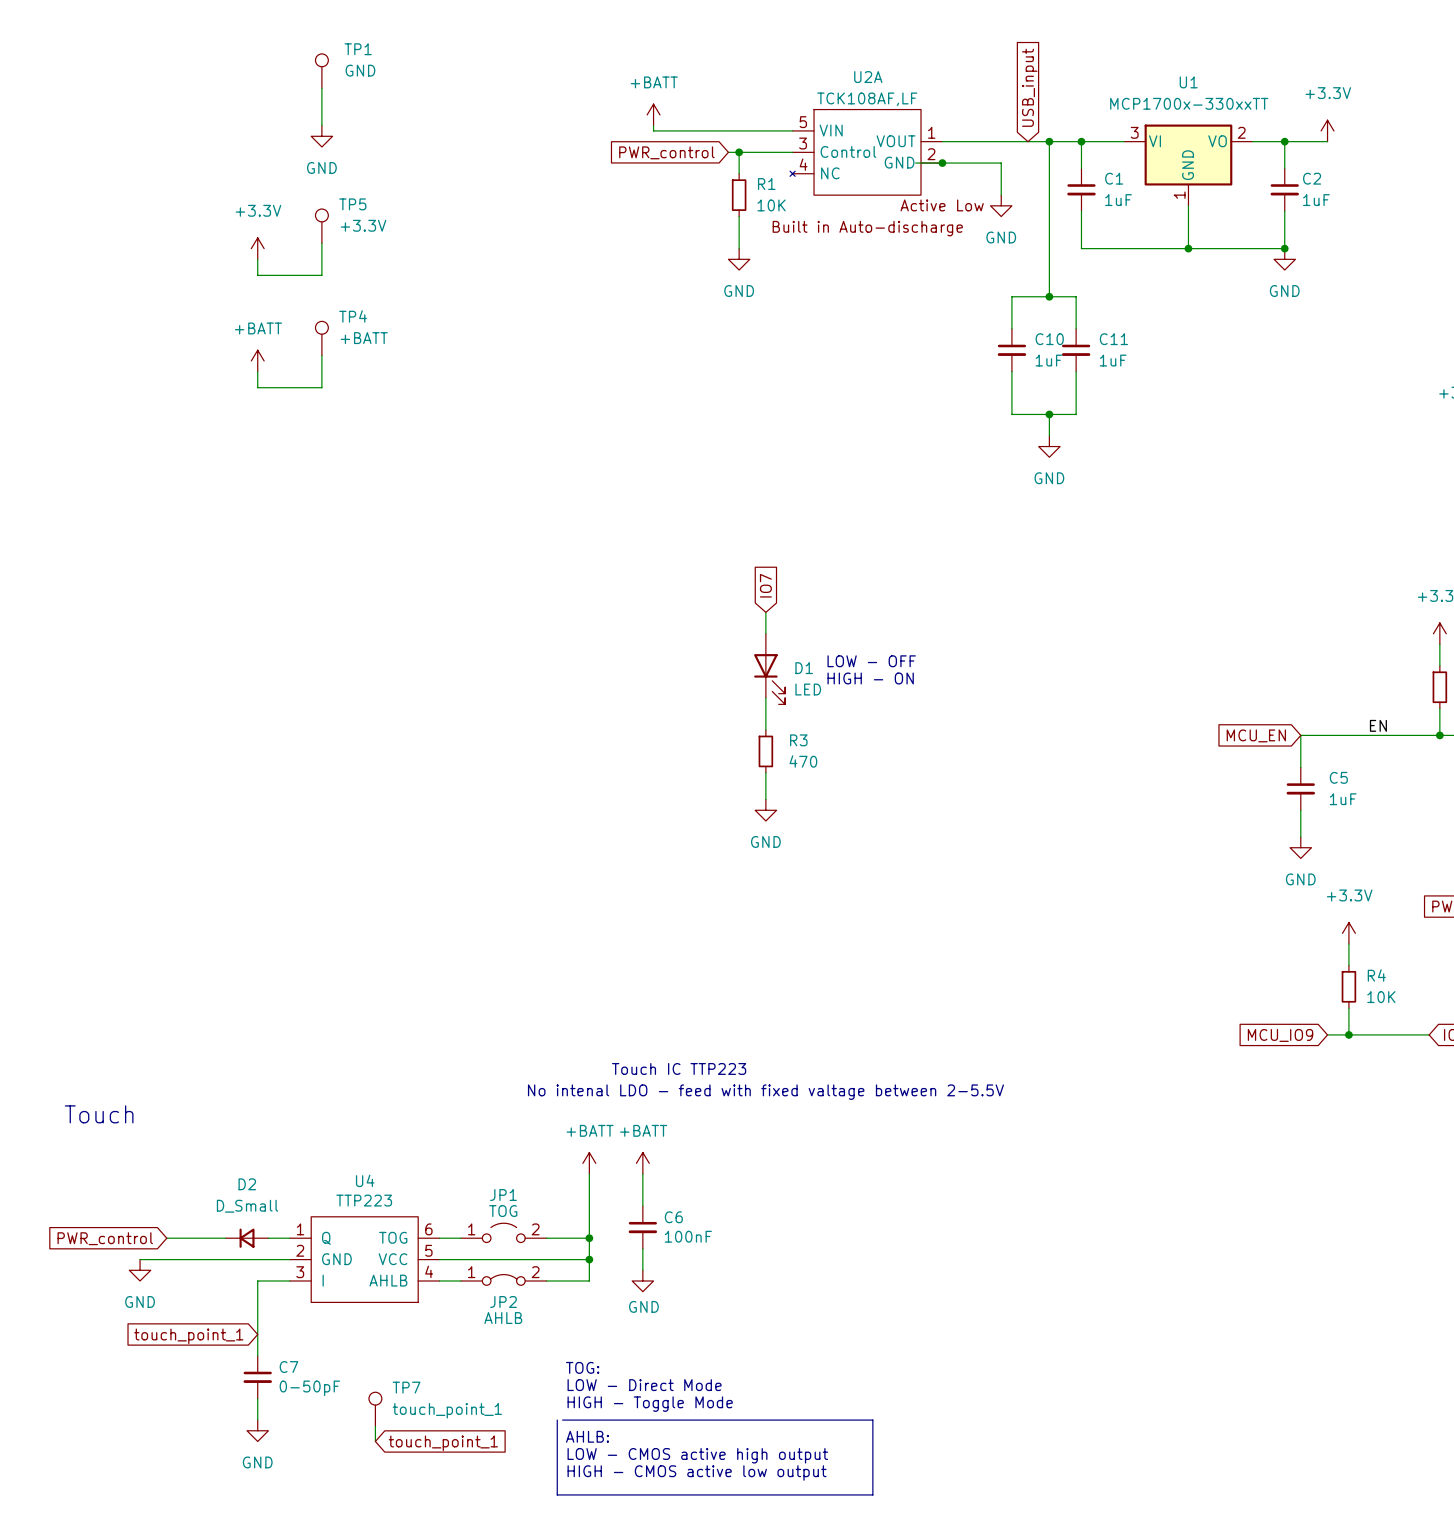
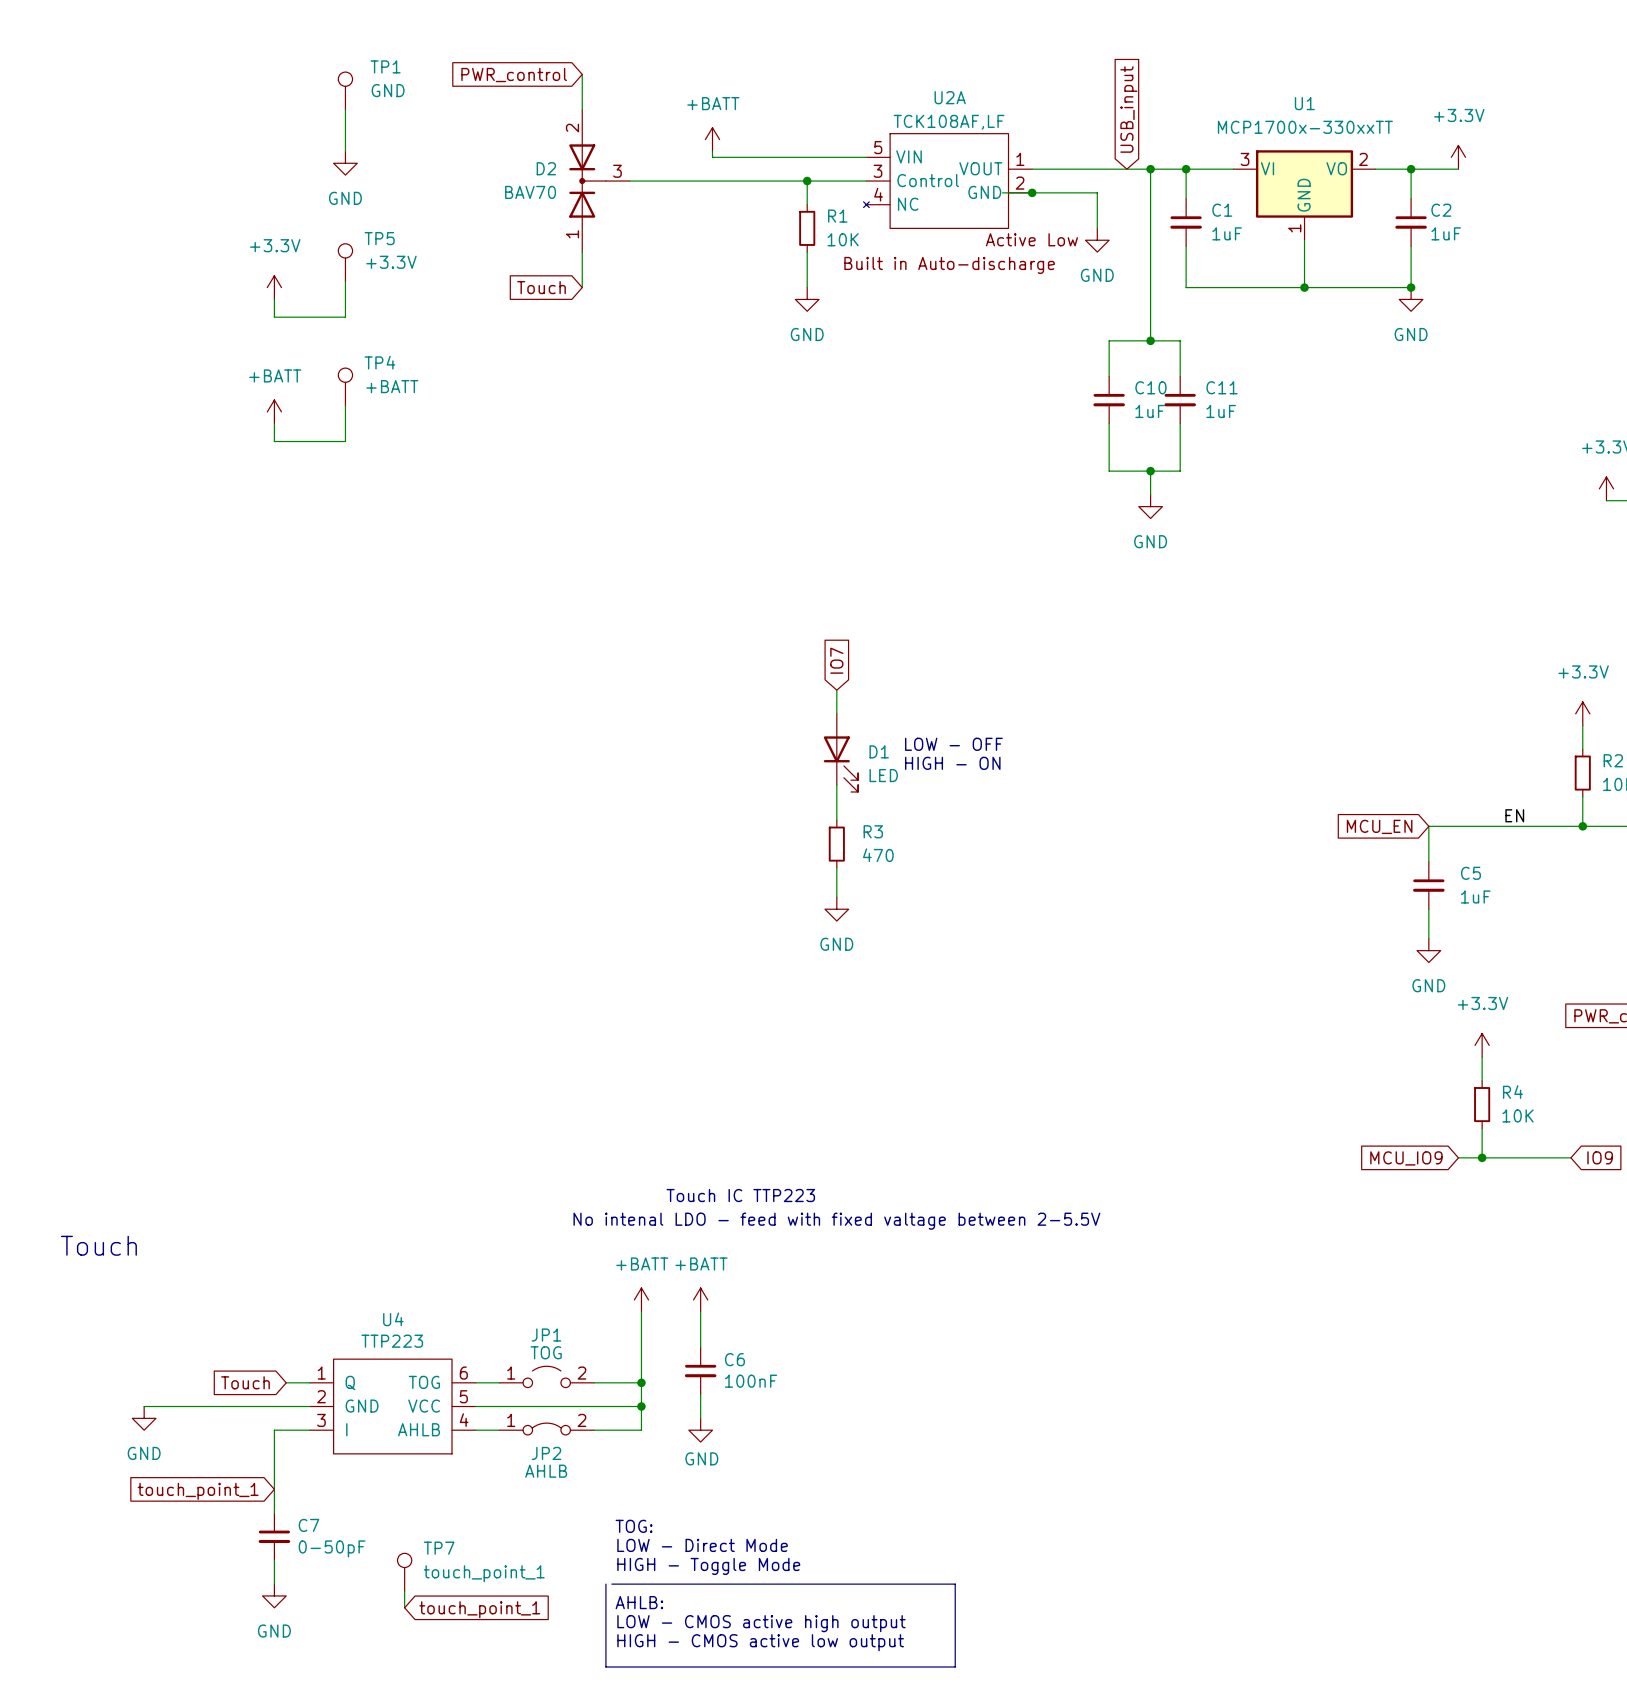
global label: none -> PWR_control (514, 75)
wire: none -> (582, 74) (582, 109)
wire: none -> (629, 181) (795, 181)
global label: PWR_control (666, 152) -> none
wire: none -> (582, 252) (582, 287)
global label: none -> Touch (541, 287)
D2 name position: D2 (247, 1184) -> D2 (546, 168)
D2 value: D_Small (247, 1206) -> BAV70 (530, 192)
D2 symbol: [225, 1228, 269, 1248] -> [569, 109, 630, 253]
global label: PWR_control (105, 1238) -> none
wire: (166, 1238) (225, 1238) -> none
global label: none -> Touch (245, 1382)

